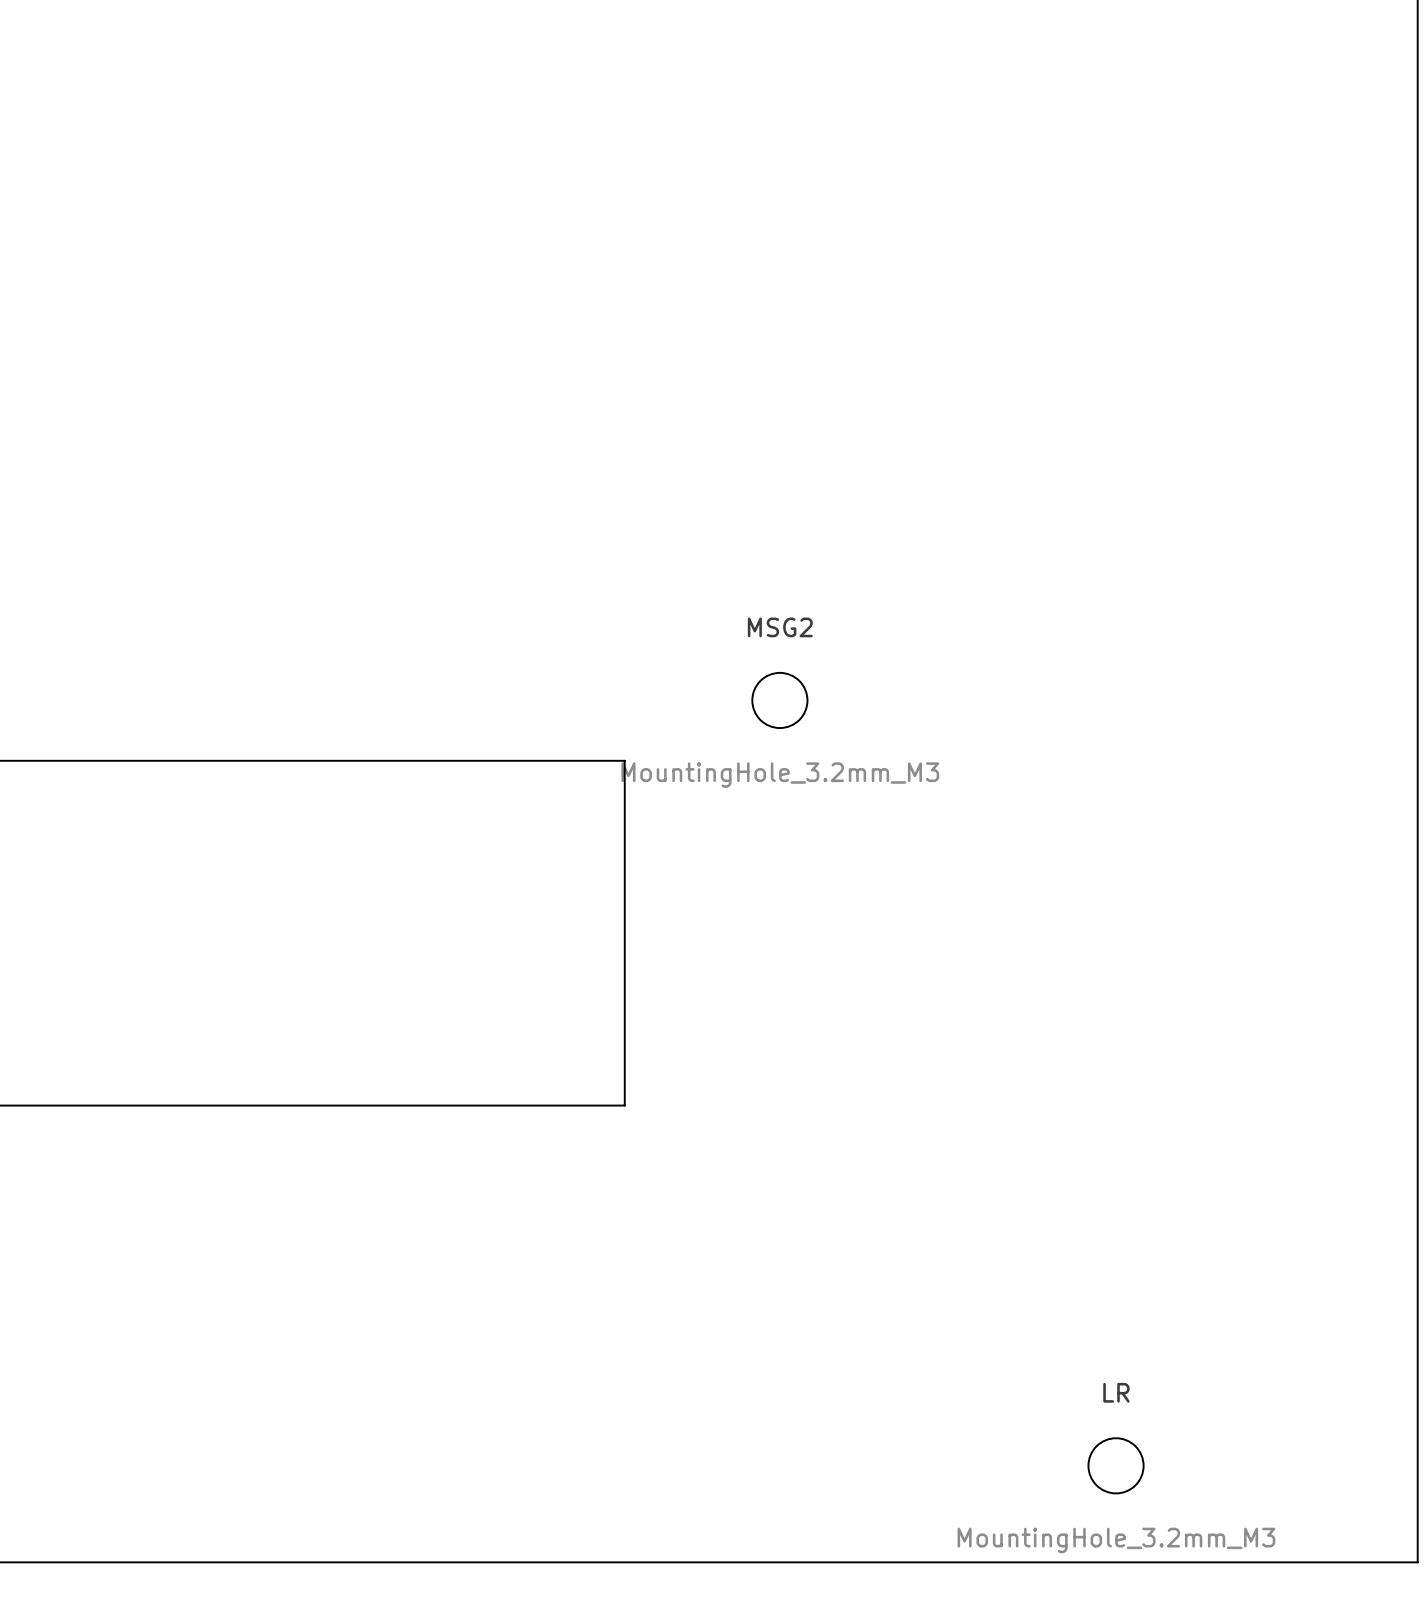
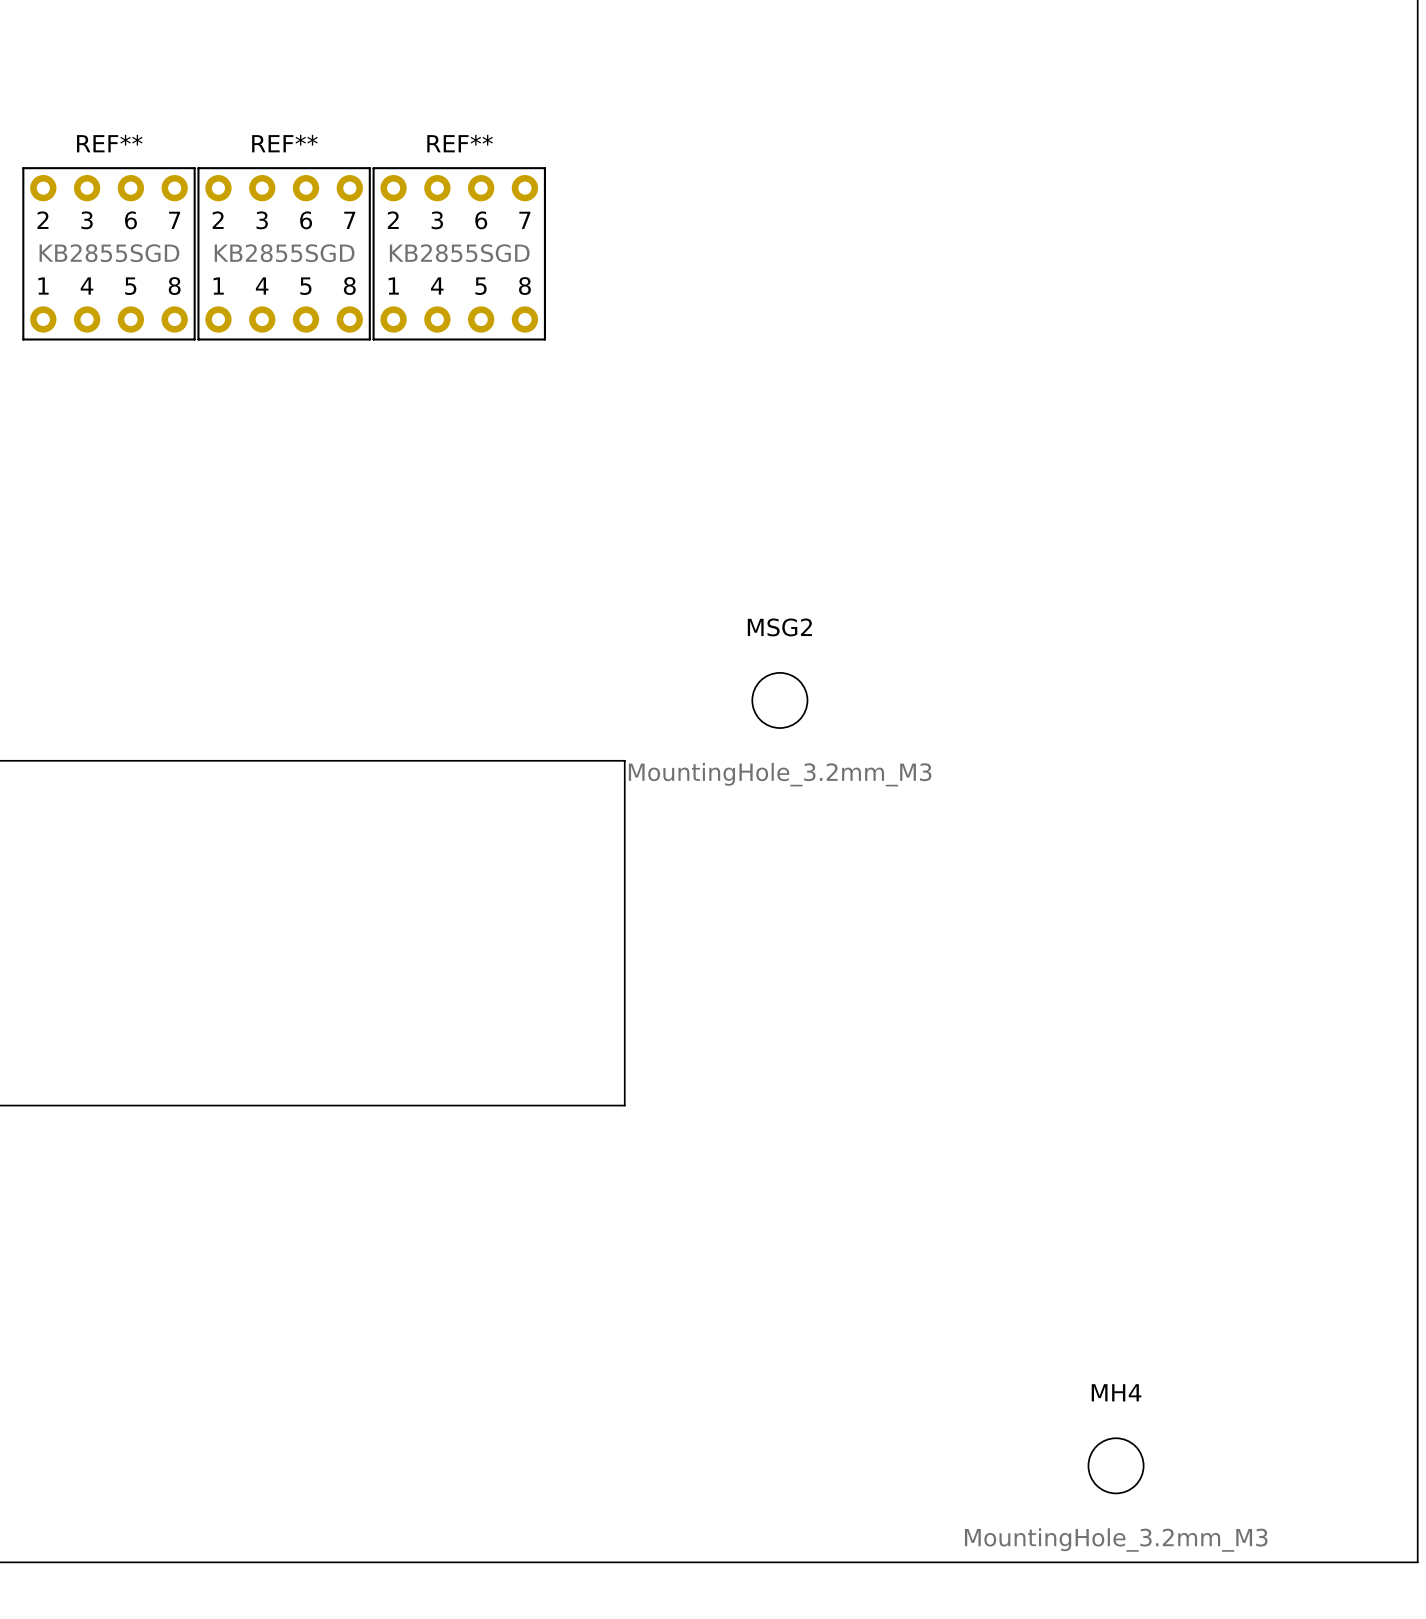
REF**: none -> KB2855SGD (108, 253)
REF**: none -> KB2855SGD (284, 253)
REF**: none -> KB2855SGD (459, 253)
LR name: LR (1116, 1392) -> MH4 (1116, 1392)

